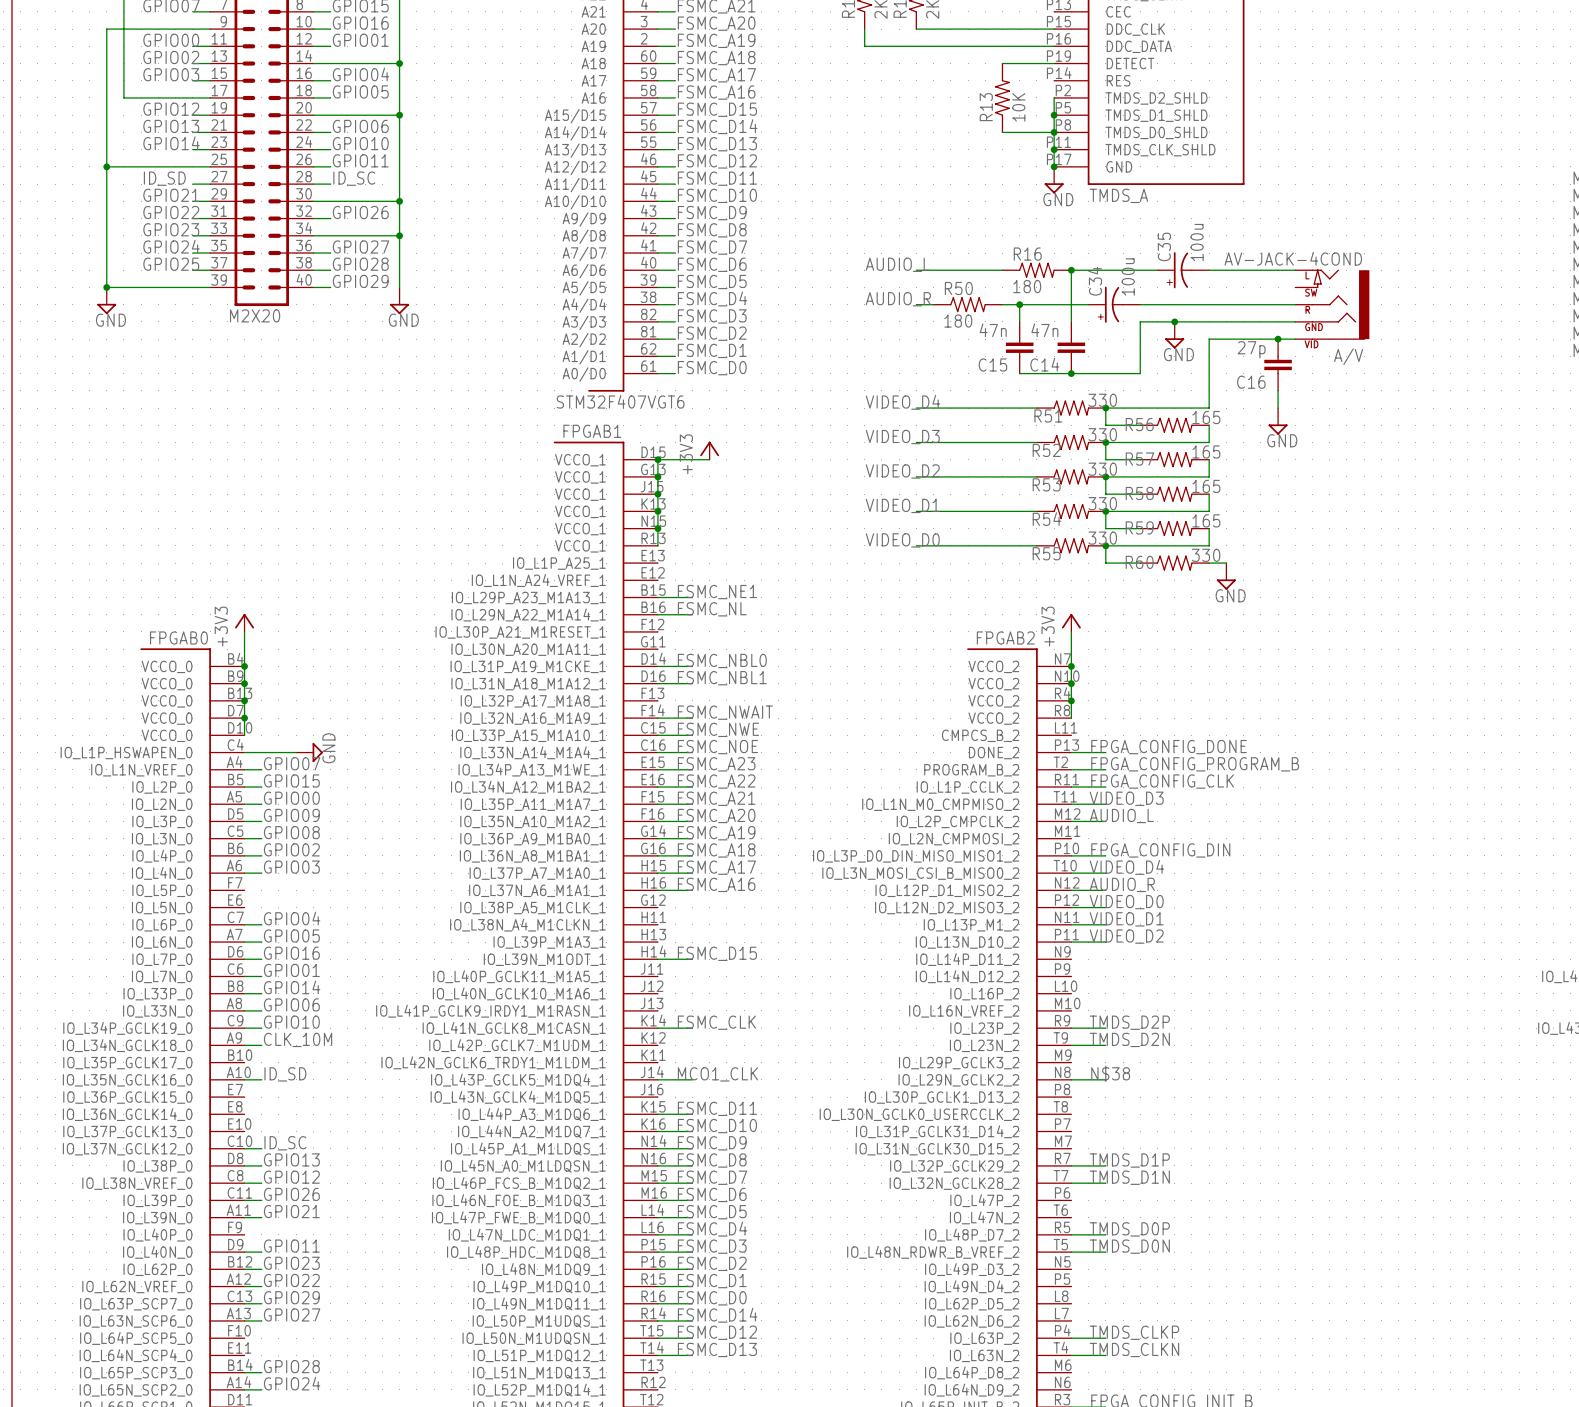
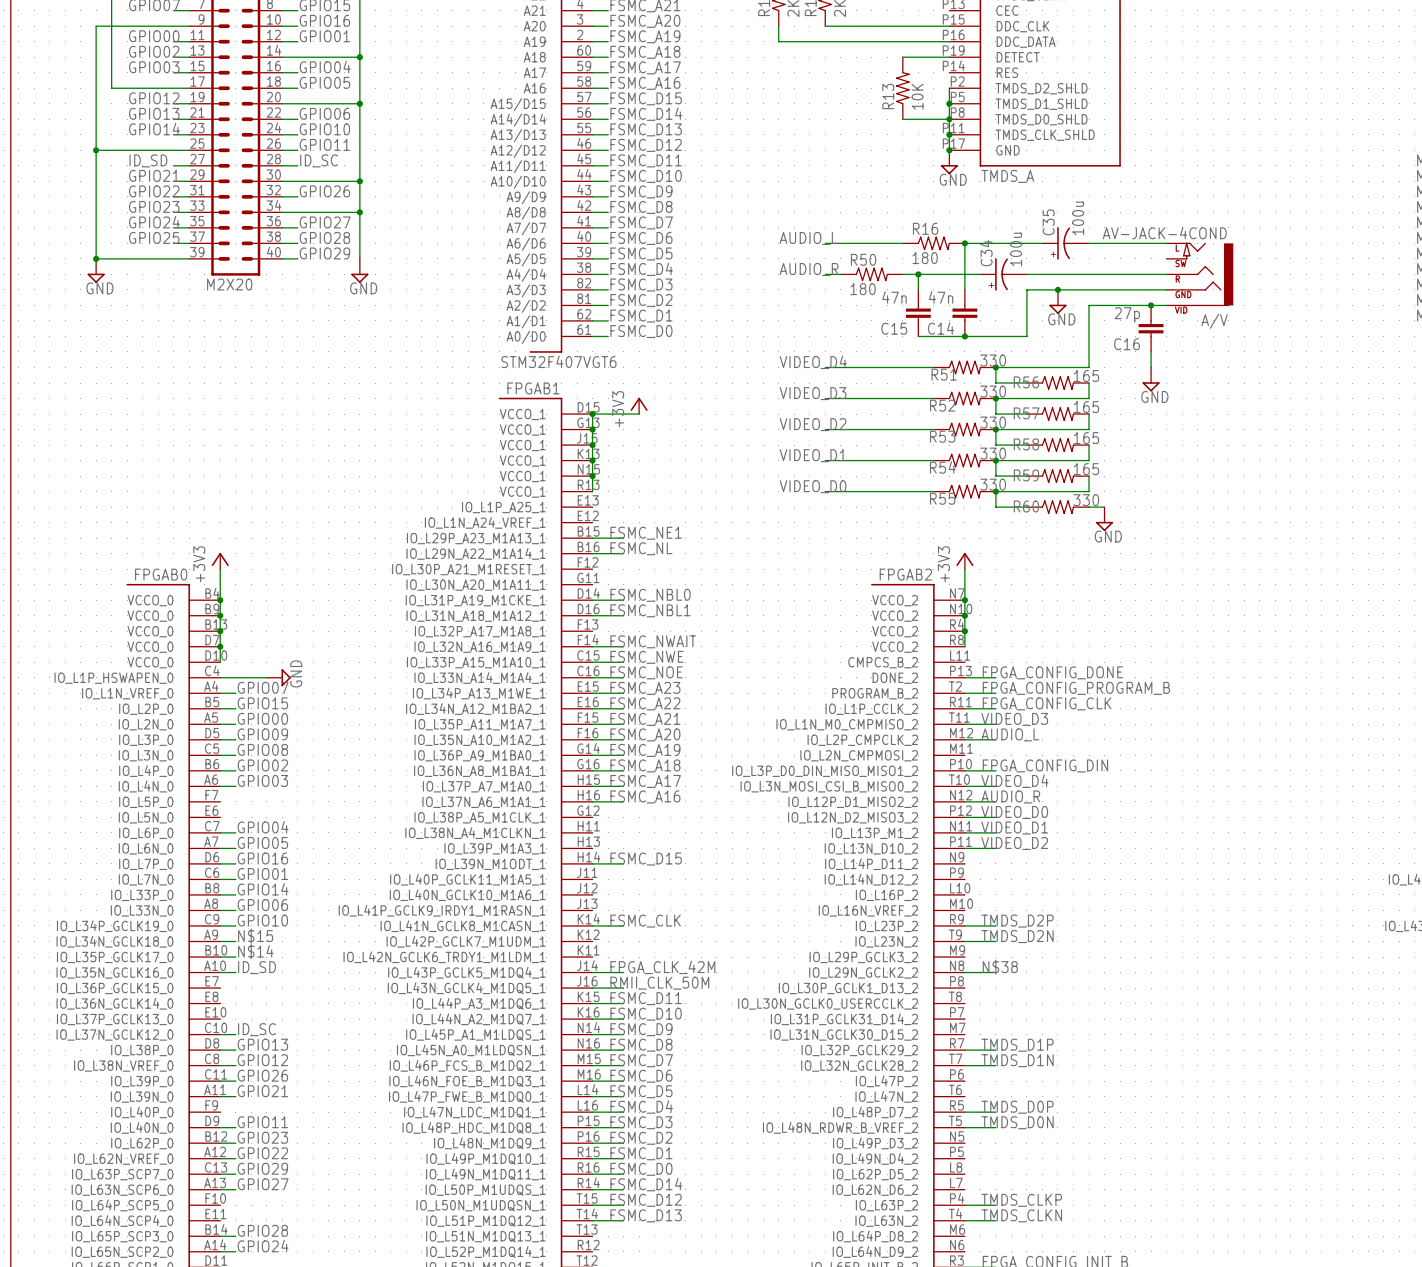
label: CLK_10M (298, 1039) -> N$15 (255, 936)
label: none -> N$14 (255, 951)
wire: none -> (220, 957) (235, 957)
label: MCO1_CLK (717, 1074) -> FPGA_CLK_42M (662, 967)
label: none -> RMII_CLK_50M (659, 983)
wire: none -> (592, 988) (623, 988)

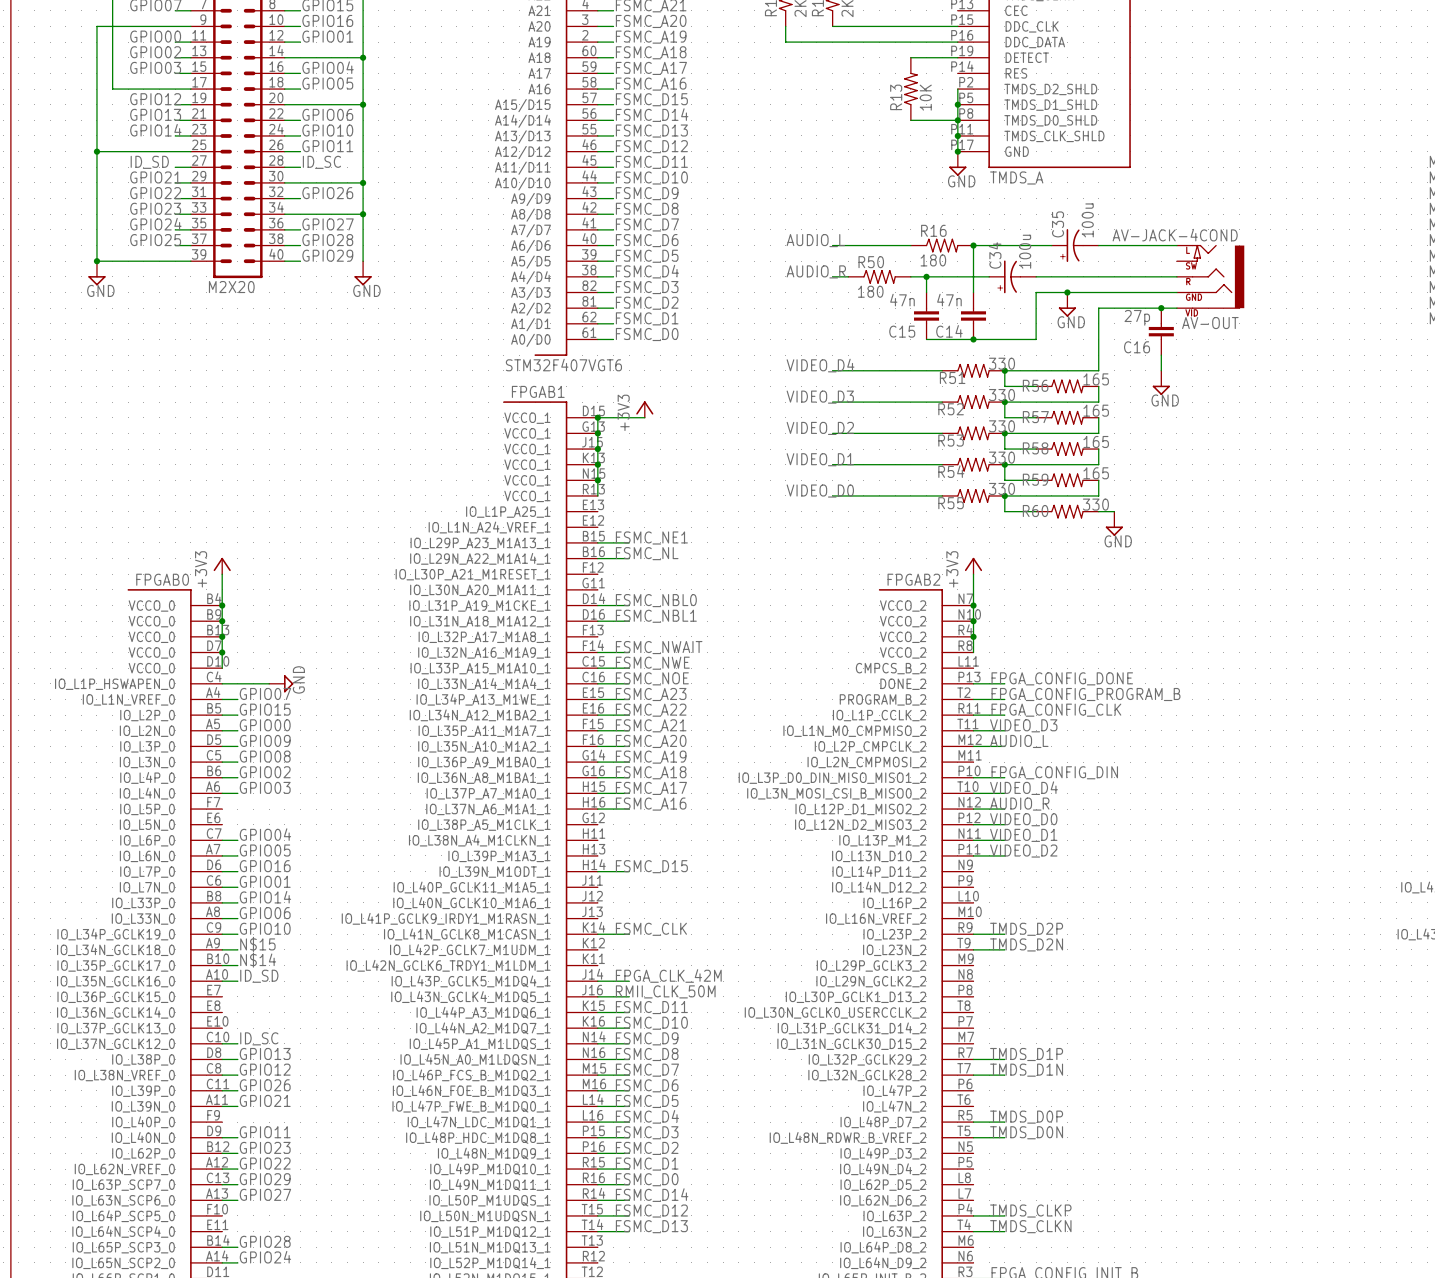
A/V name: A/V (1214, 321) -> AV-OUT (1210, 323)
label: N$38 (1000, 967) -> none
wire: (964, 972) (995, 972) -> none

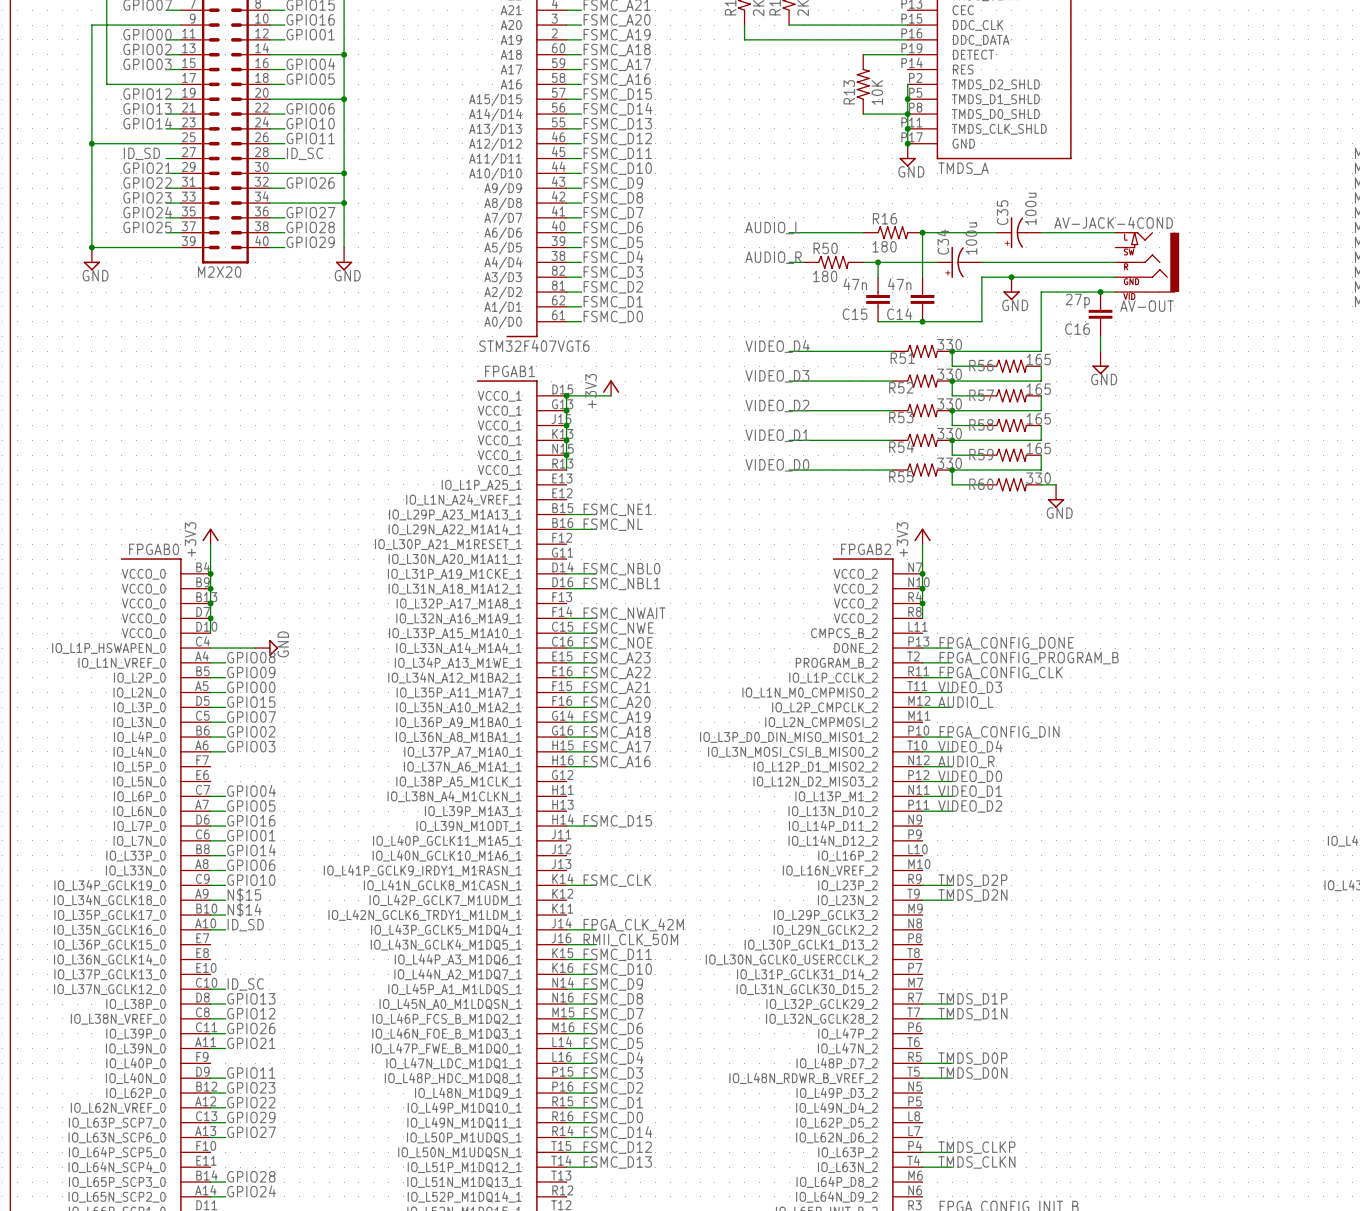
label: GPIO07 (265, 693) -> GPIO08 (251, 657)
label: GPIO15 (265, 709) -> GPIO09 (251, 672)
label: GPIO09 (265, 740) -> GPIO15 (251, 702)
label: GPIO08 (265, 756) -> GPIO07 (251, 716)

